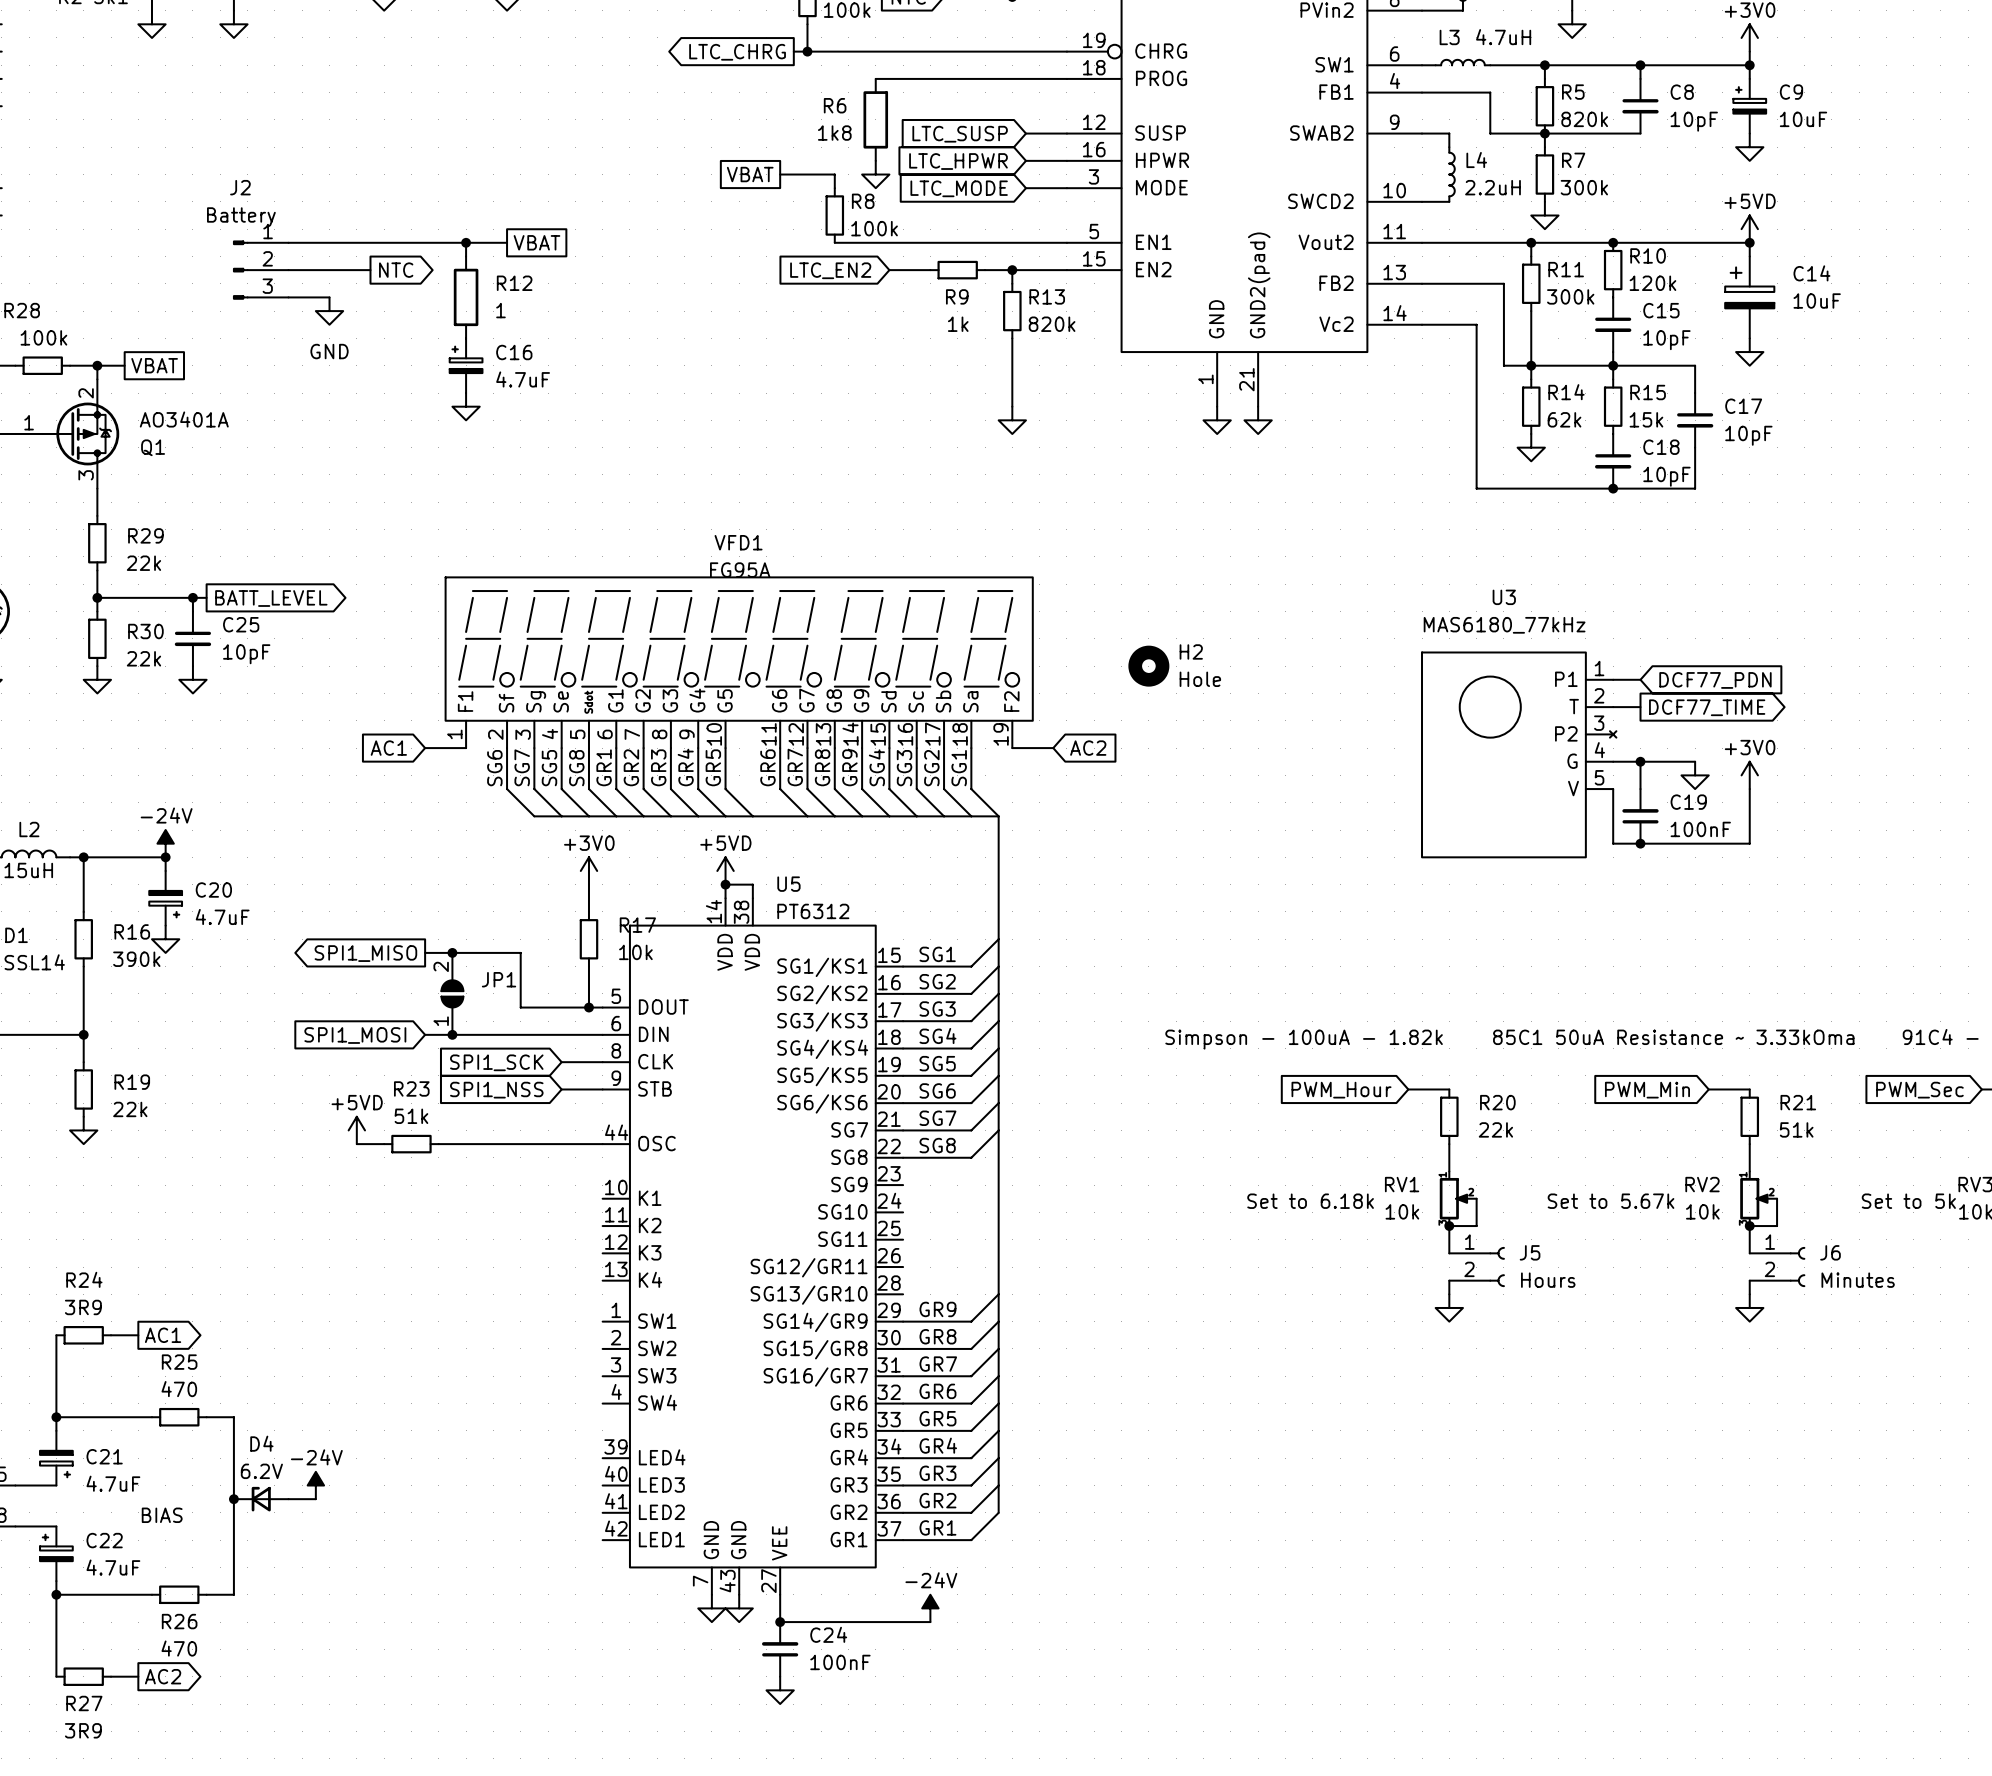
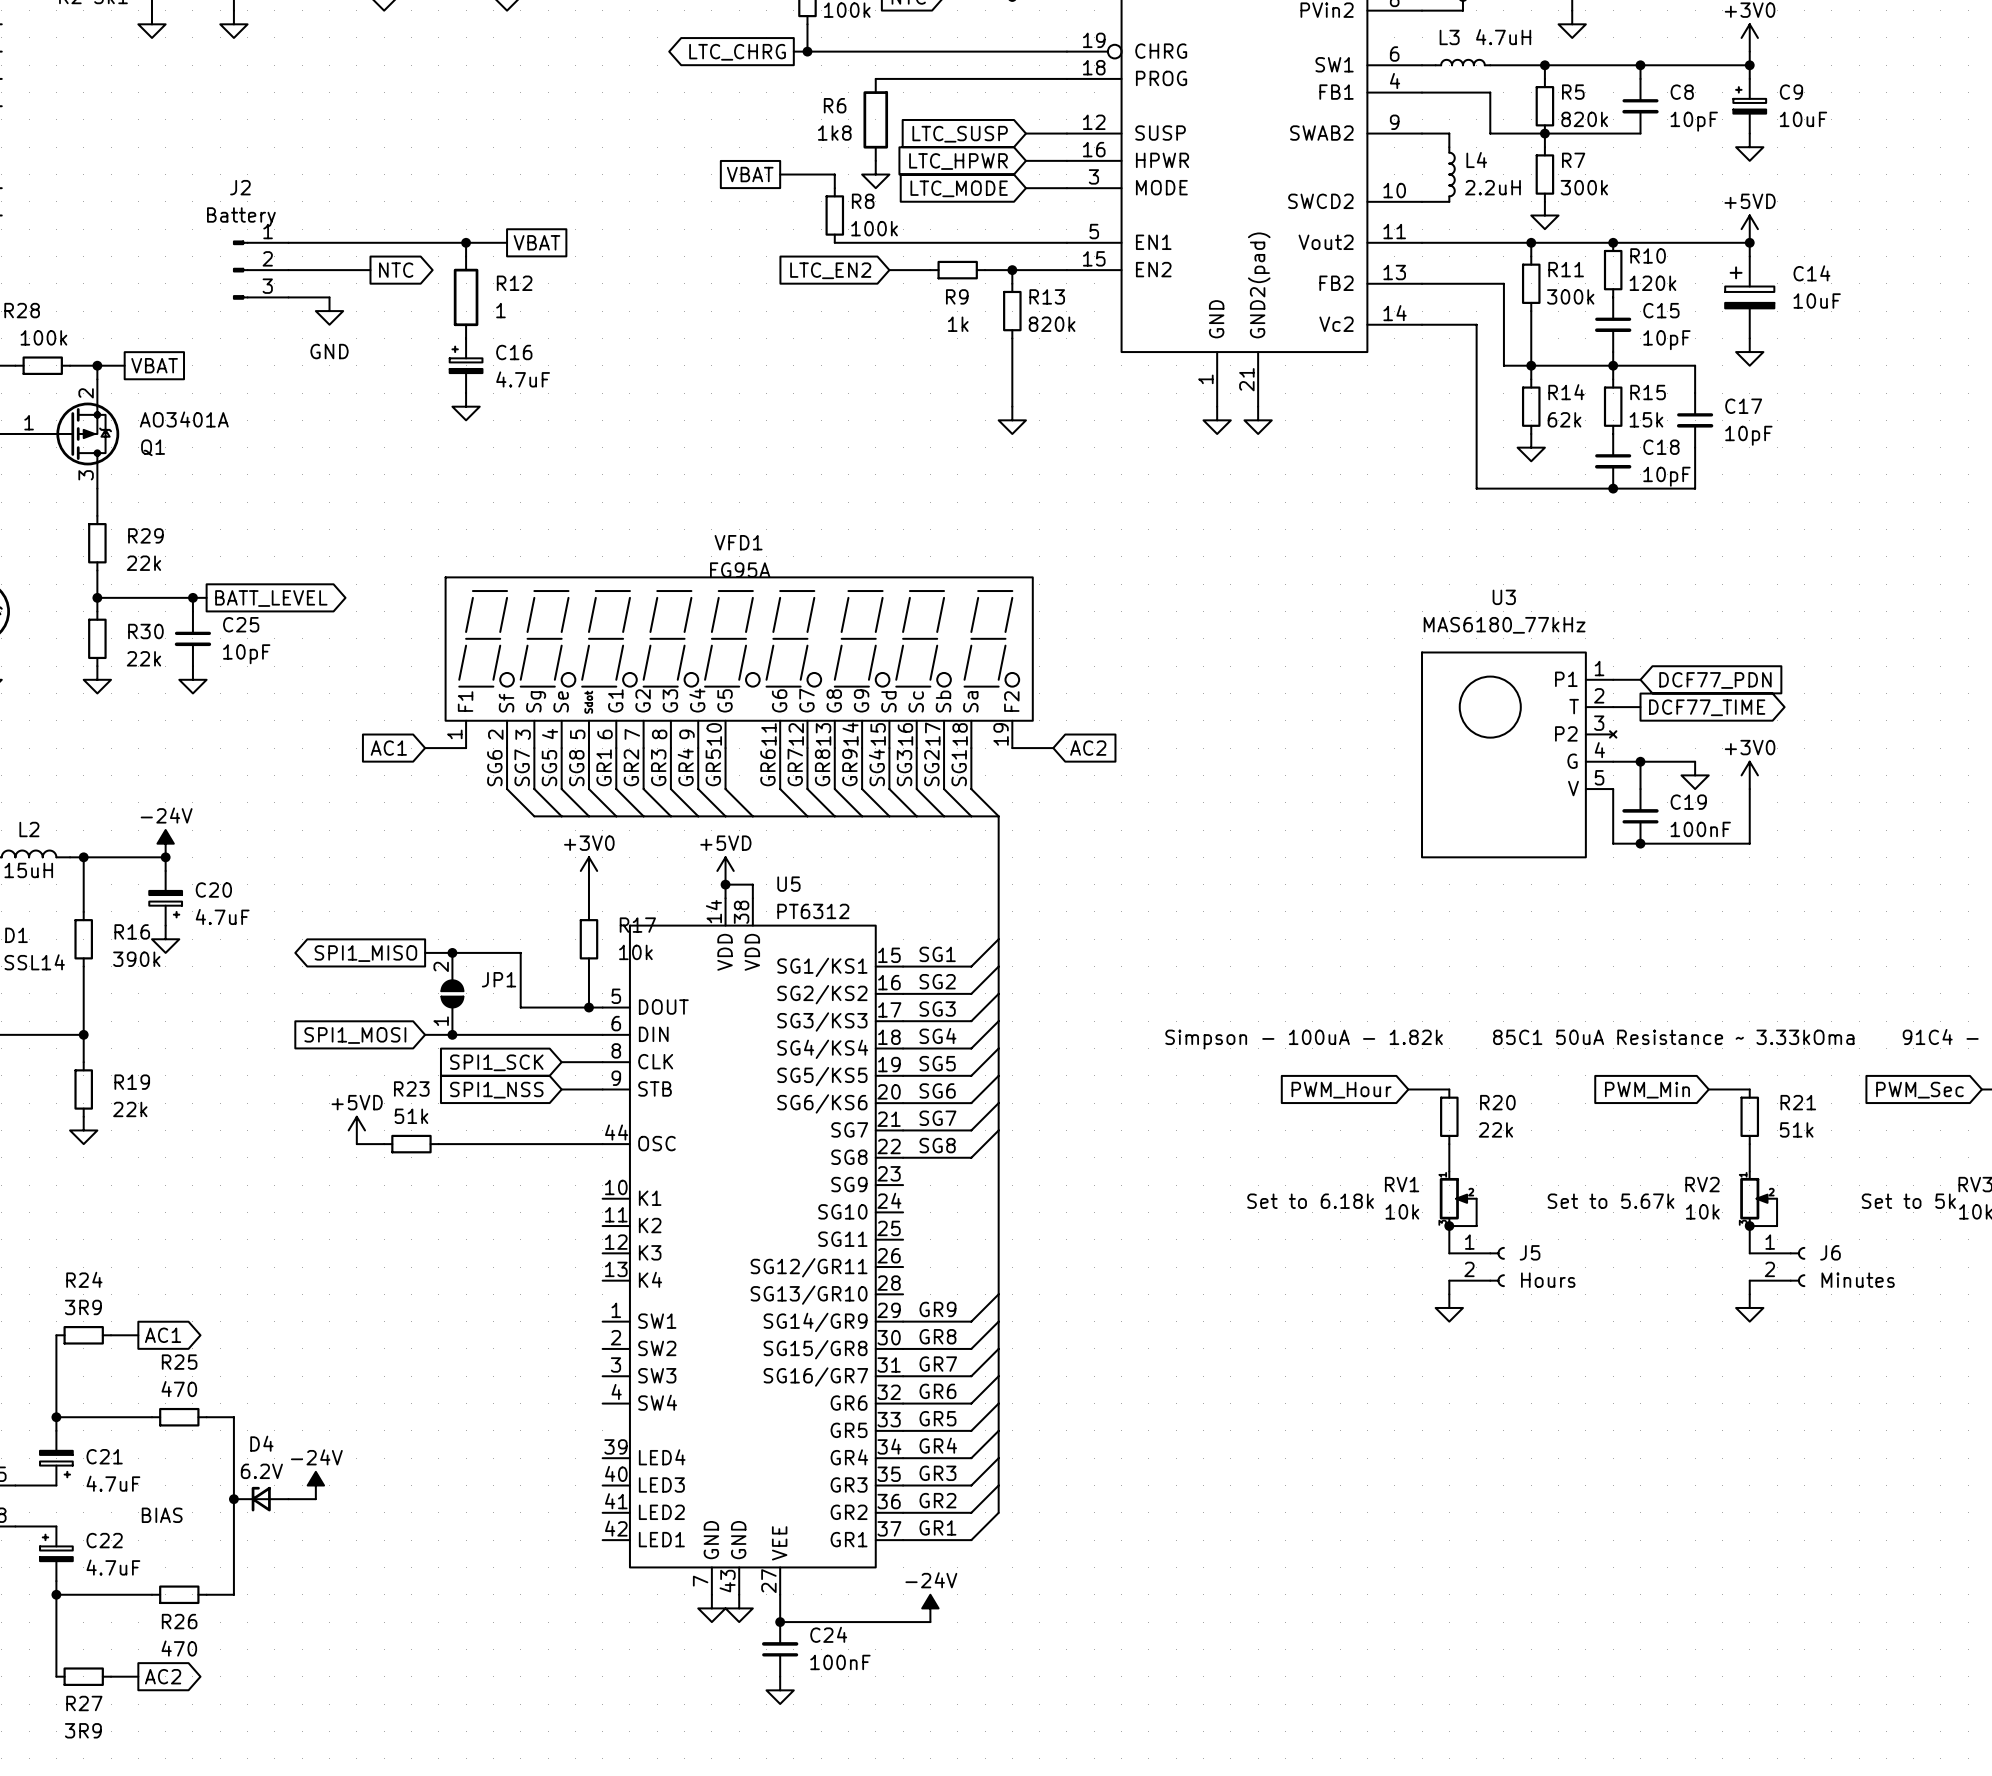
H2: Hole (1148, 666) -> none

